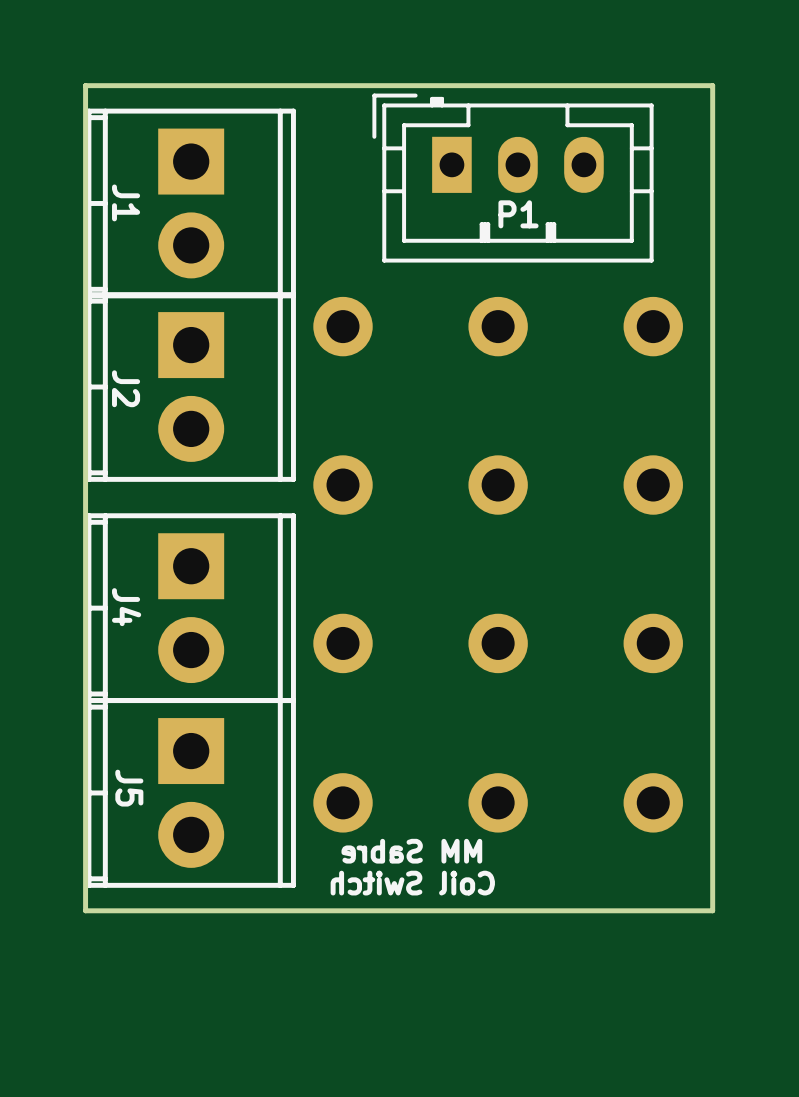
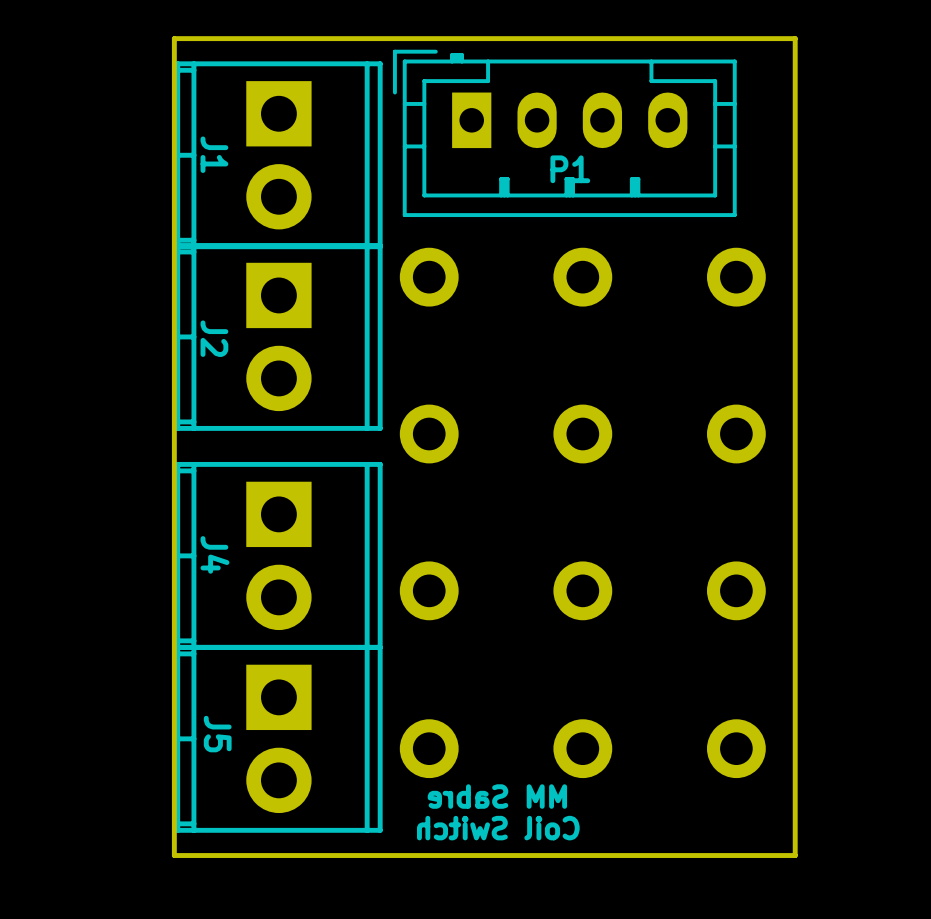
P1 footprint: [372, 93, 654, 263] -> [392, 49, 737, 218]

